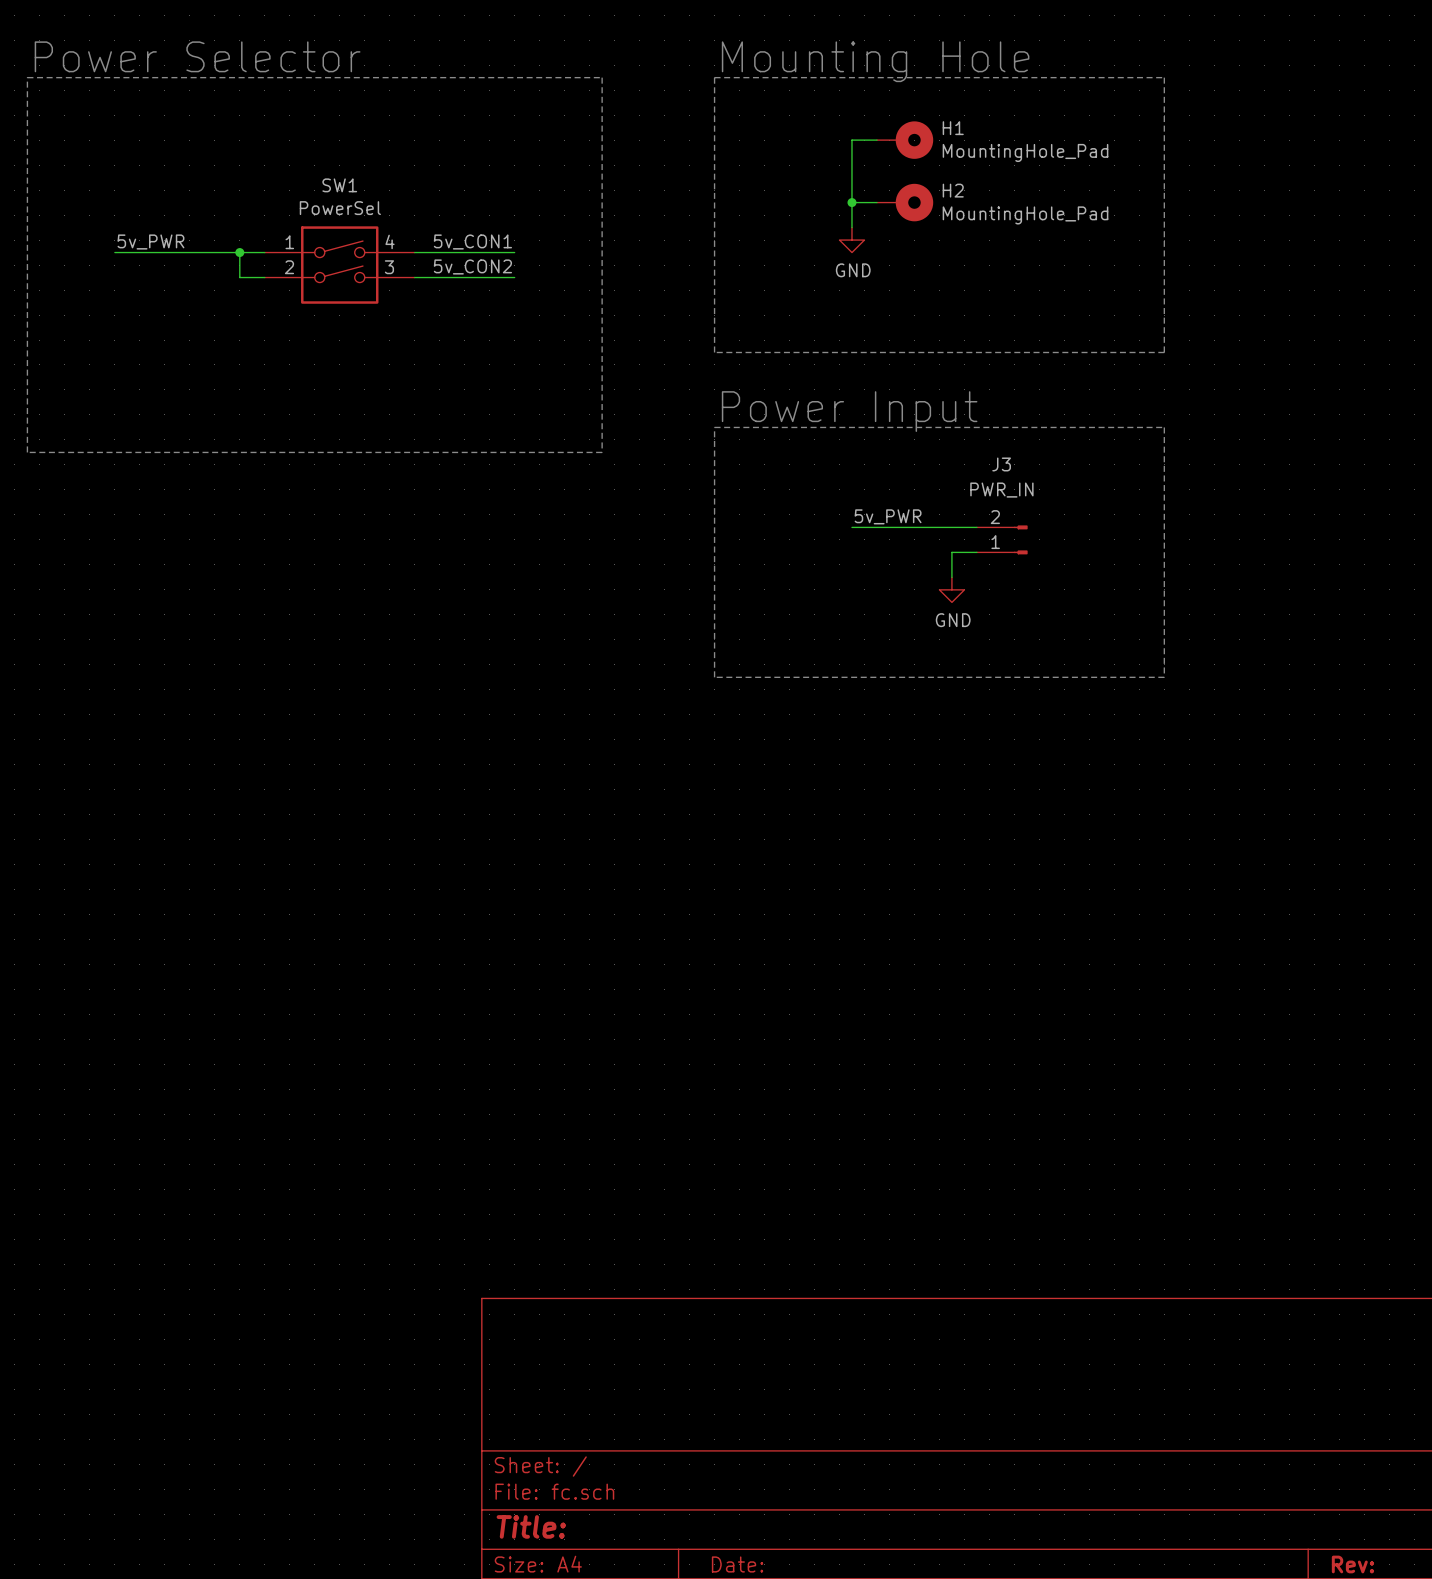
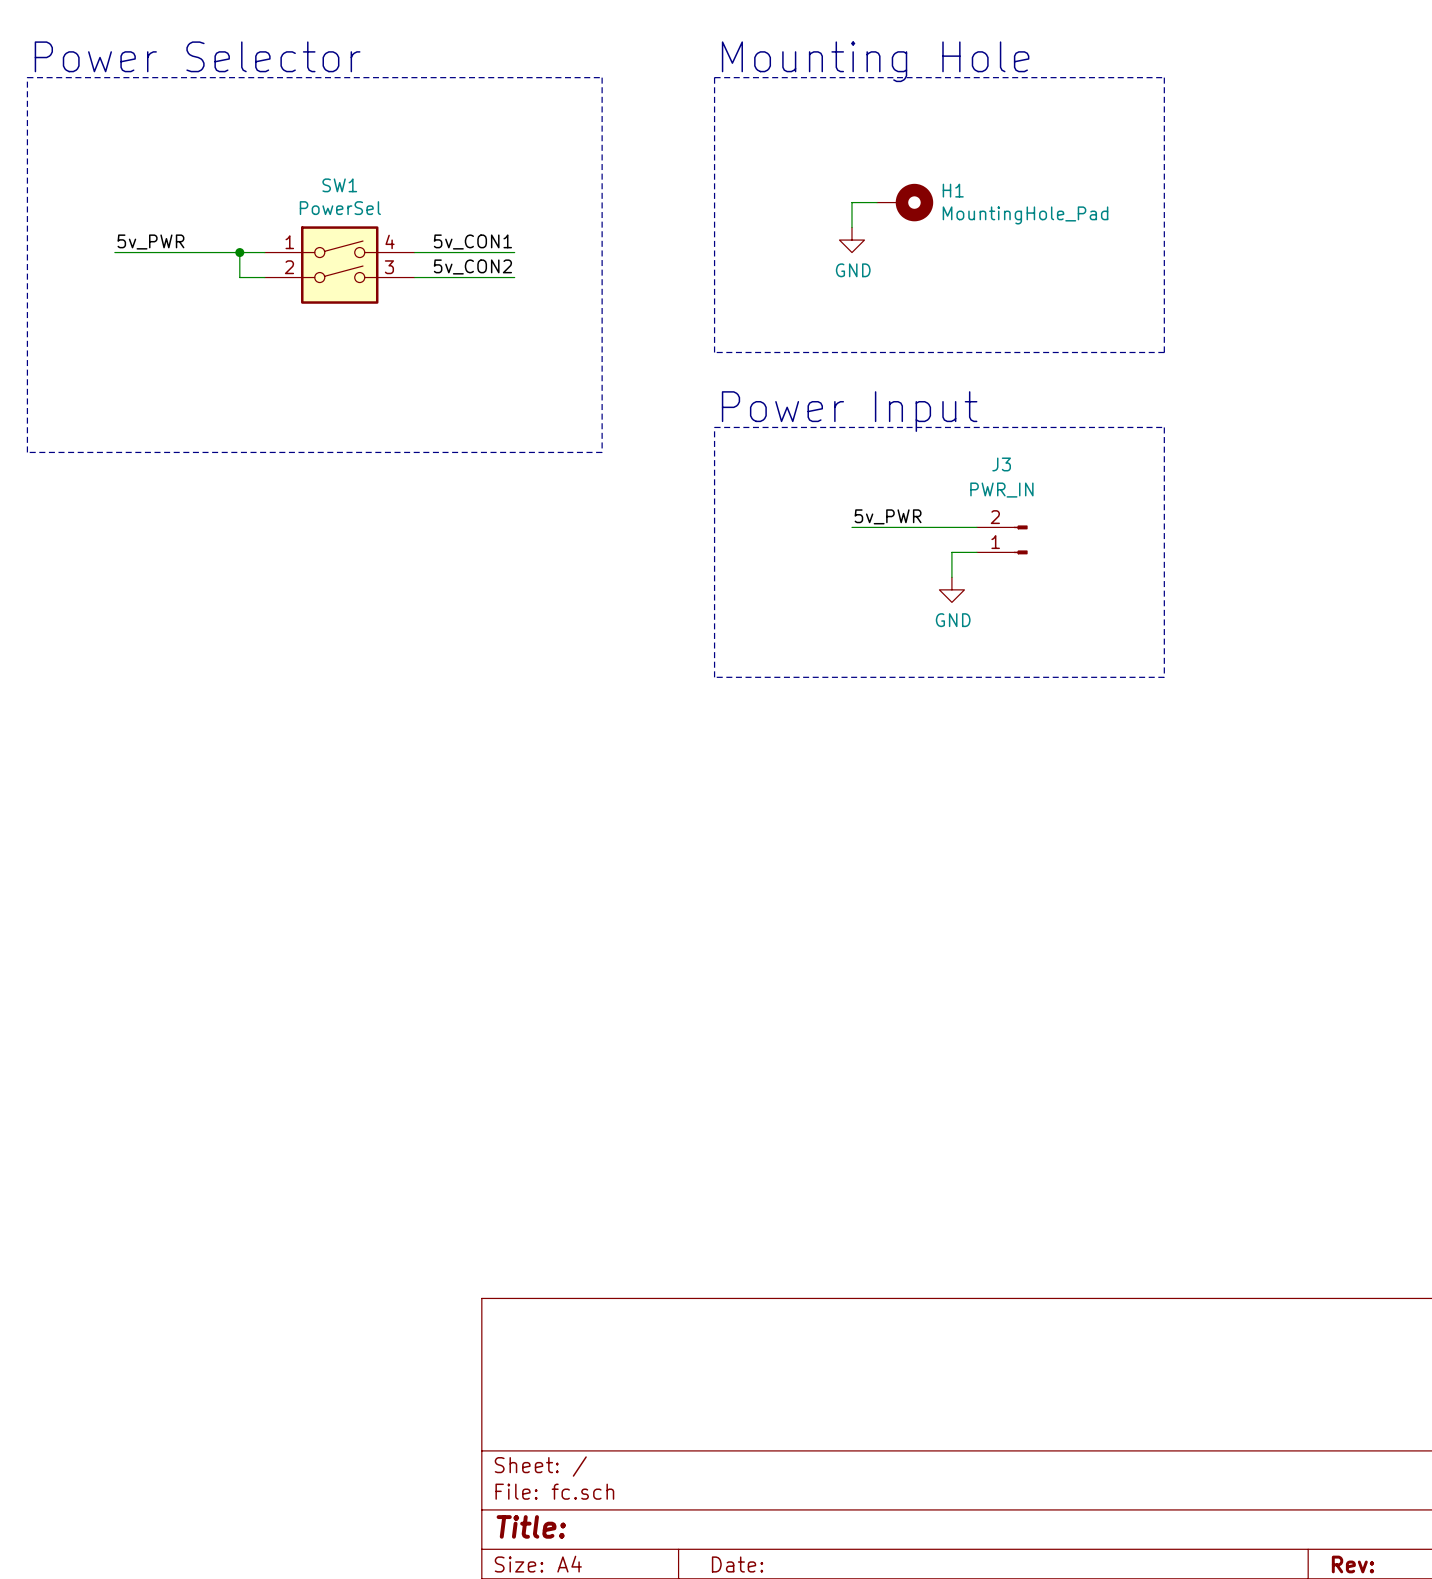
wire: (876, 140) (851, 140) (851, 202) -> none
H1: MountingHole_Pad (905, 140) -> none
H2 name: H2 (953, 190) -> H1 (953, 190)
junction: (851, 202) -> none

